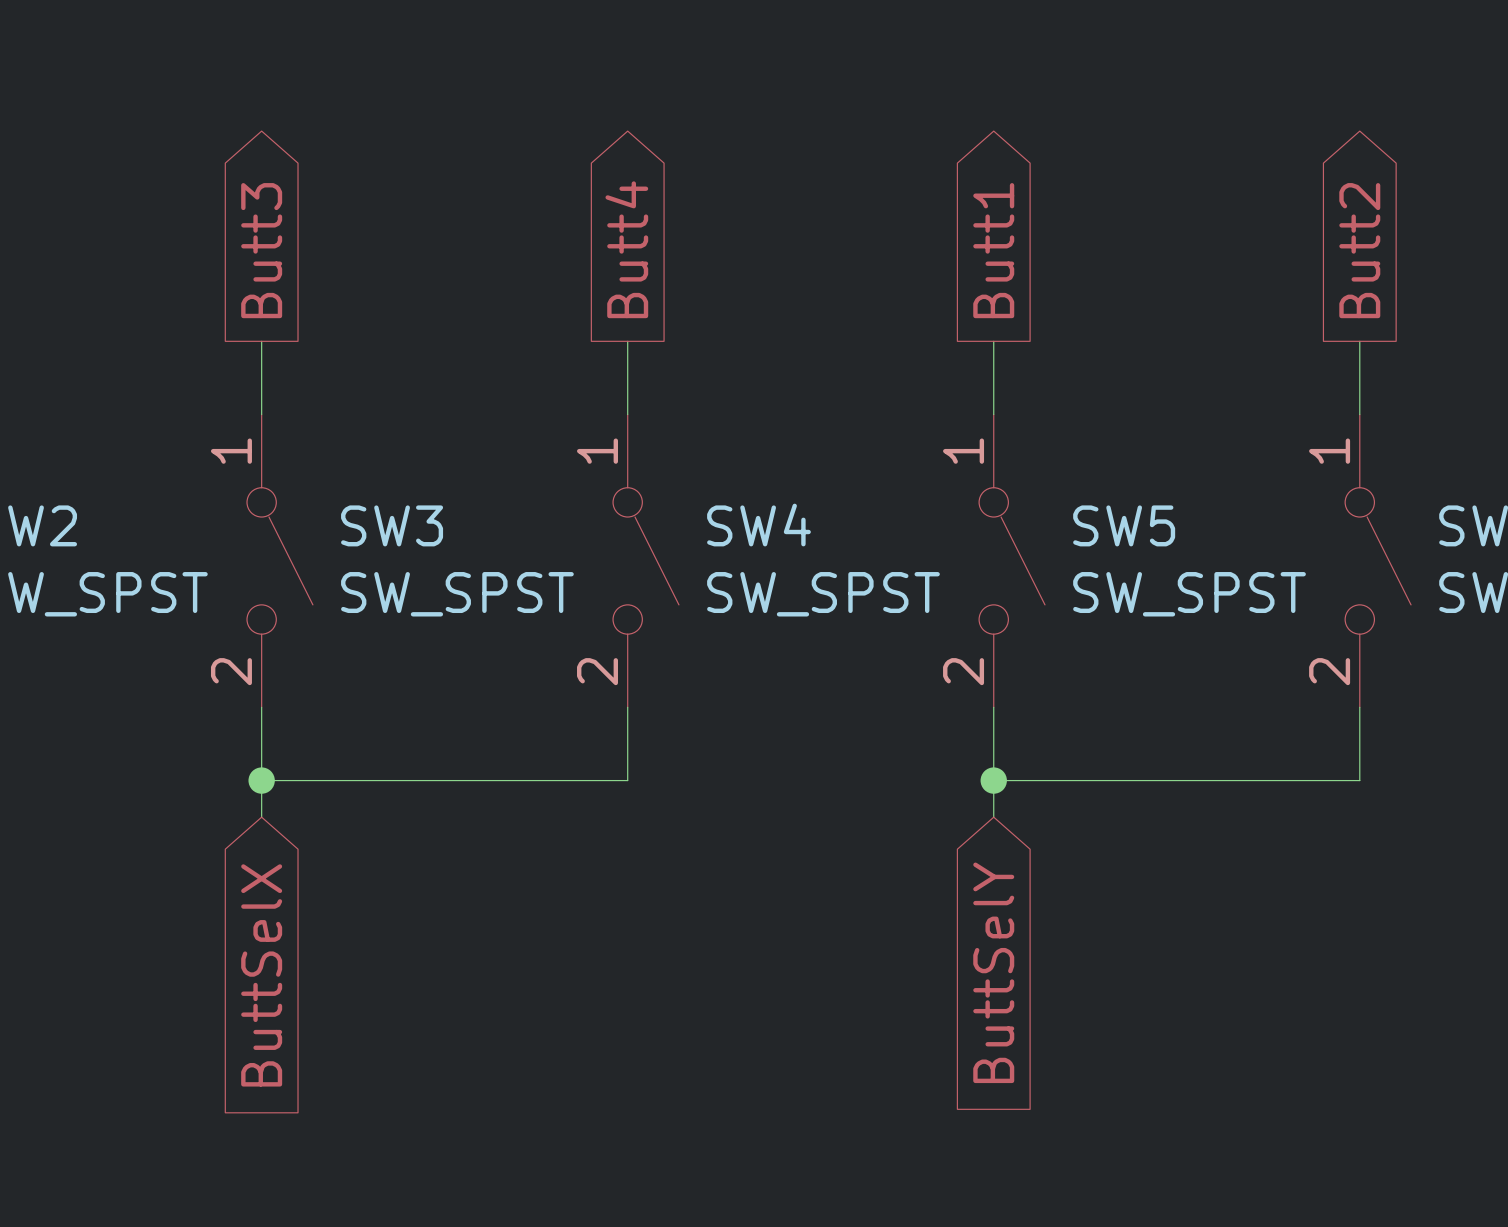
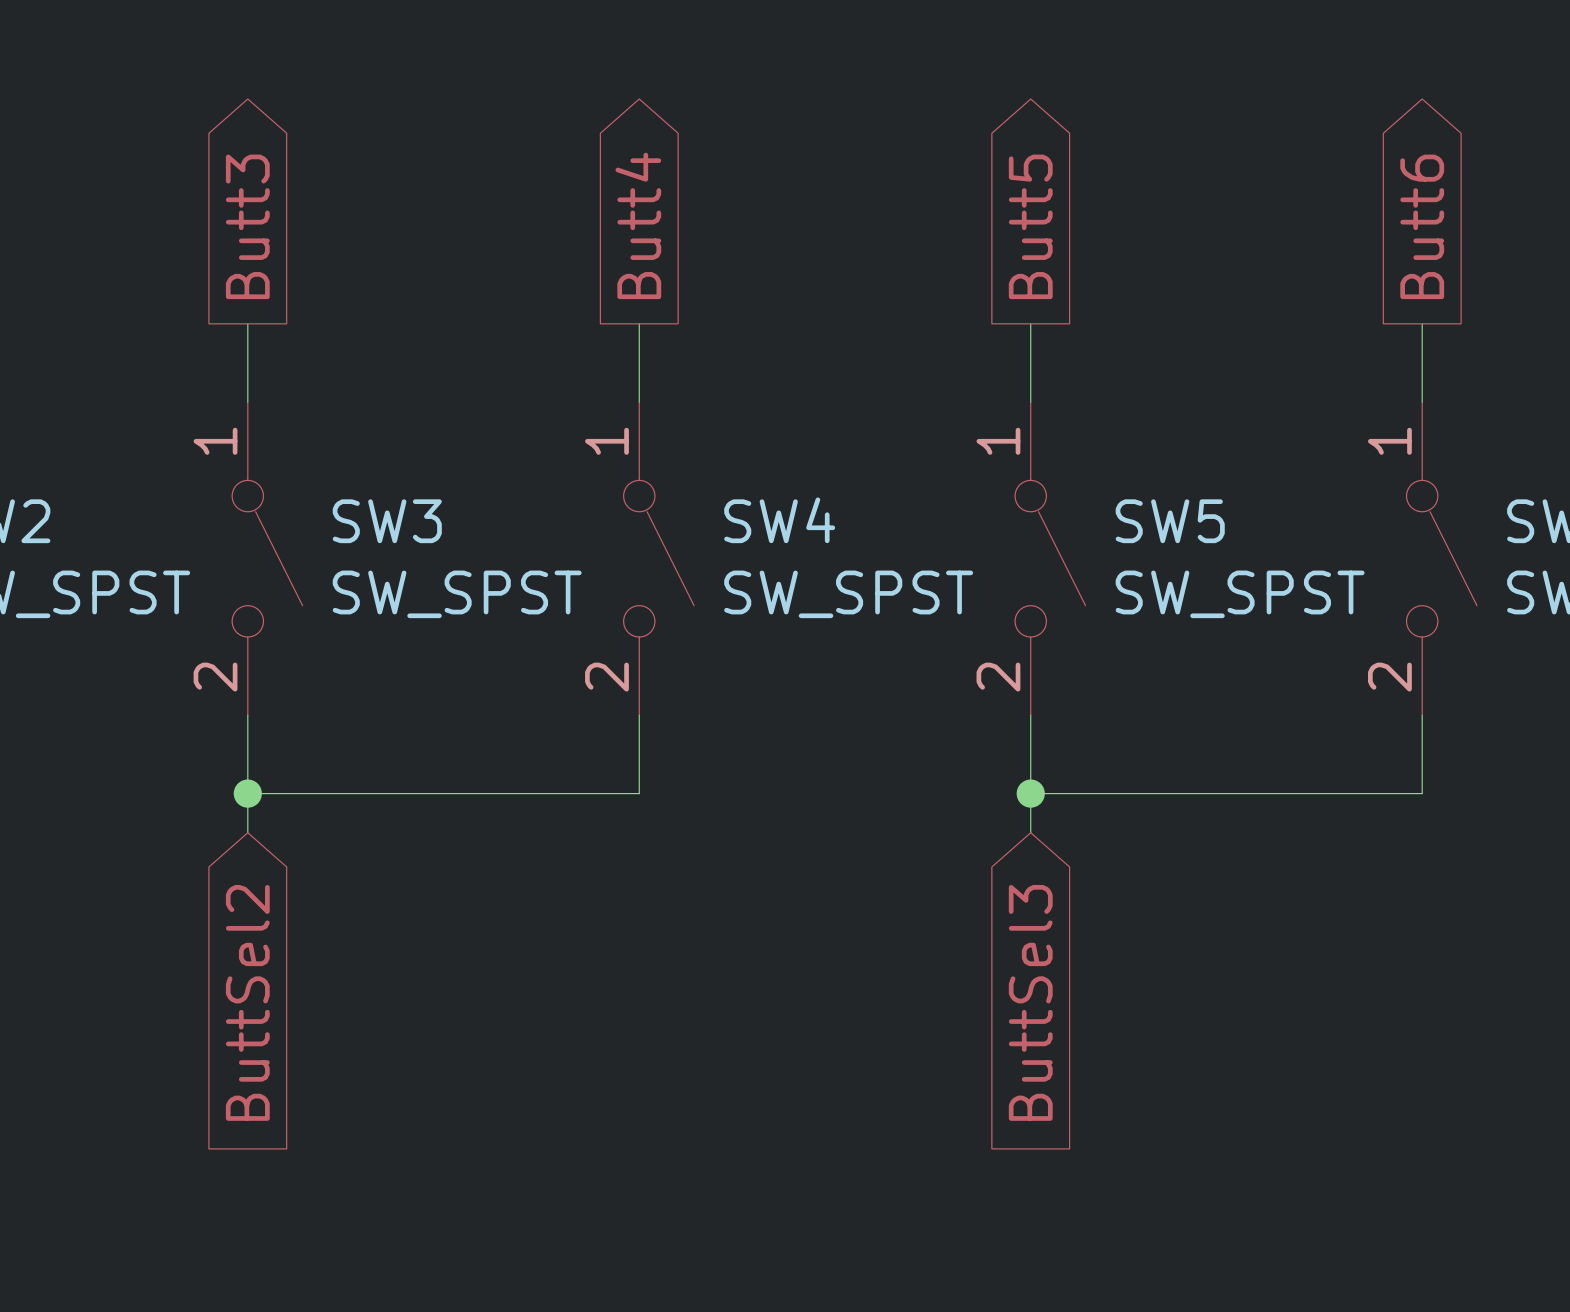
global label: Butt1 (993, 250) -> Butt5 (1030, 226)
global label: Butt2 (1359, 250) -> Butt6 (1422, 226)
global label: ButtSelY (993, 972) -> ButtSel3 (1030, 1002)
global label: ButtSelX (261, 975) -> ButtSel2 (247, 1002)

